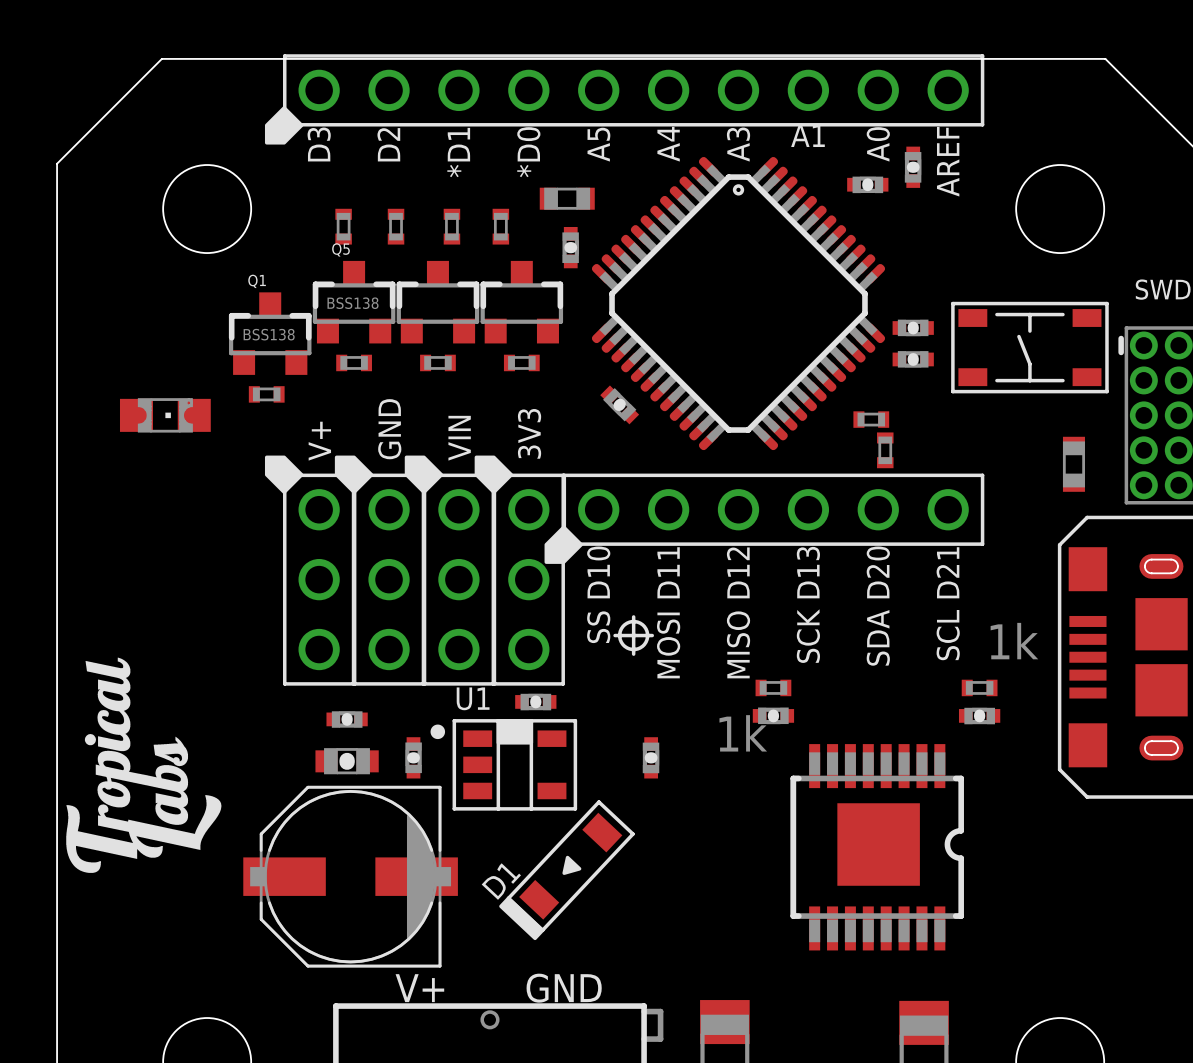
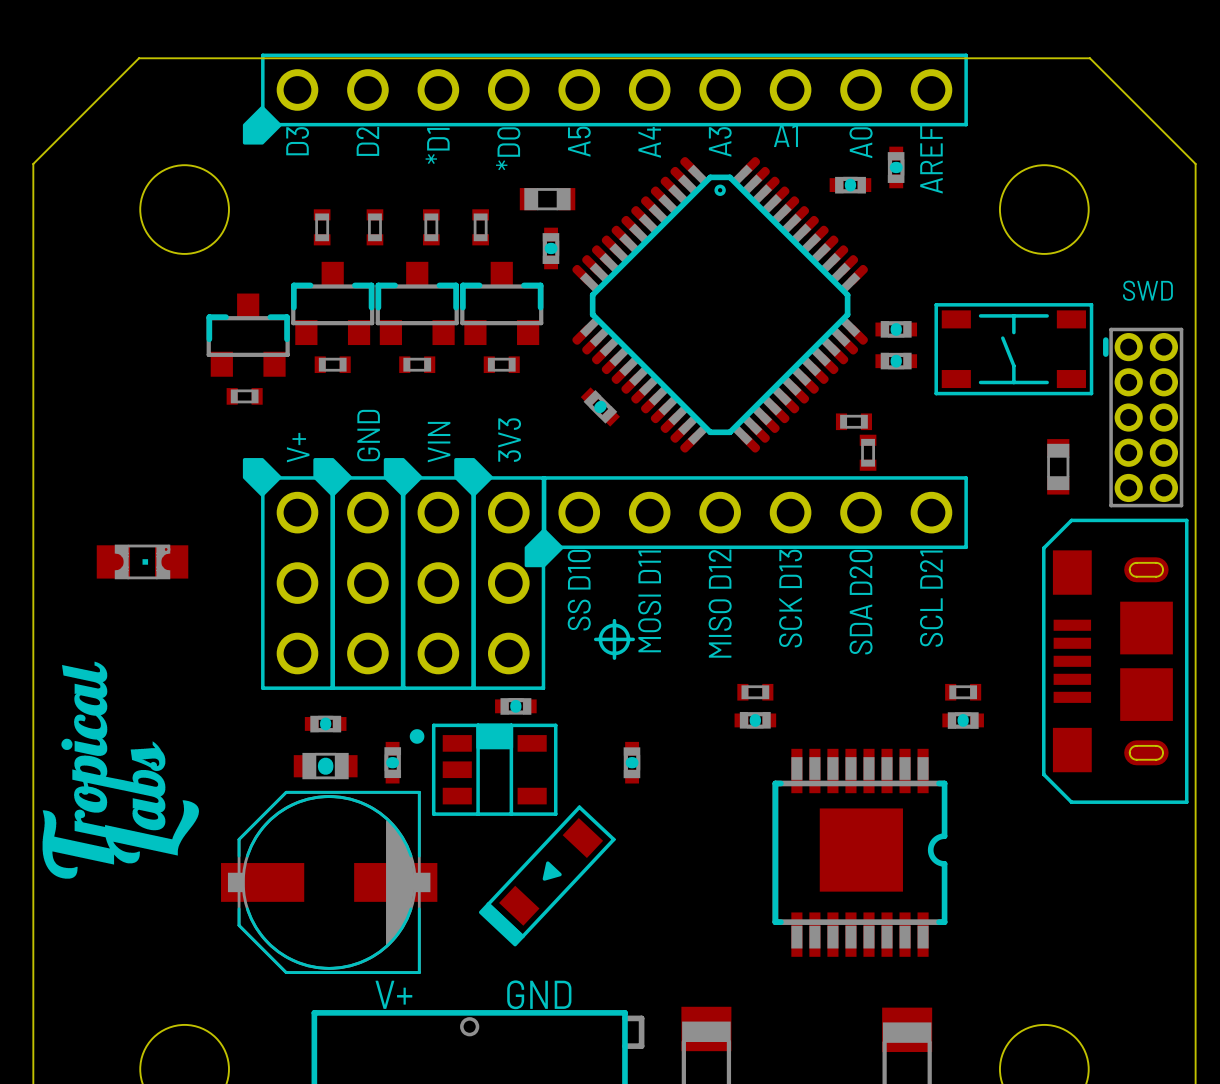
Q5 name: Q5 (340, 249) -> none
Q1 name: Q1 (257, 281) -> none
Q5 value: BSS138 (353, 303) -> none
Q1 value: BSS138 (269, 334) -> none
part position: (165, 415) -> (142, 561)
part value: 1k (1014, 641) -> none
U1 name: U1 (473, 698) -> none
part value: 1k (743, 733) -> none
D1 name: D1 (501, 881) -> none

